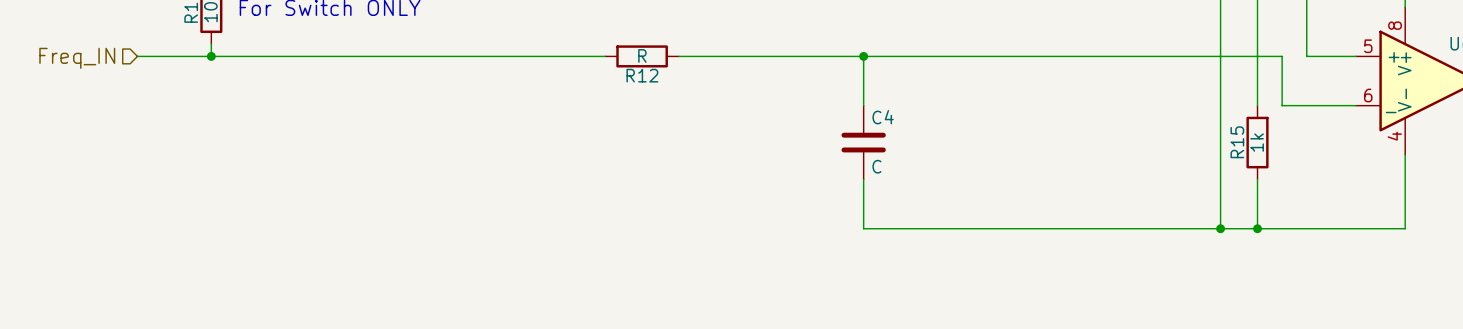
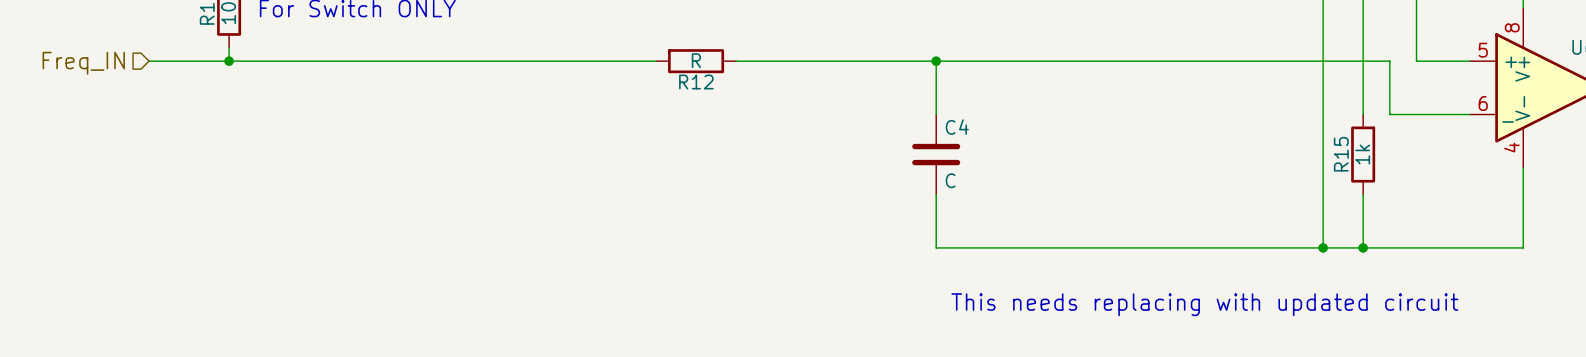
text: none -> This needs replacing with updated circuit (1204, 304)

